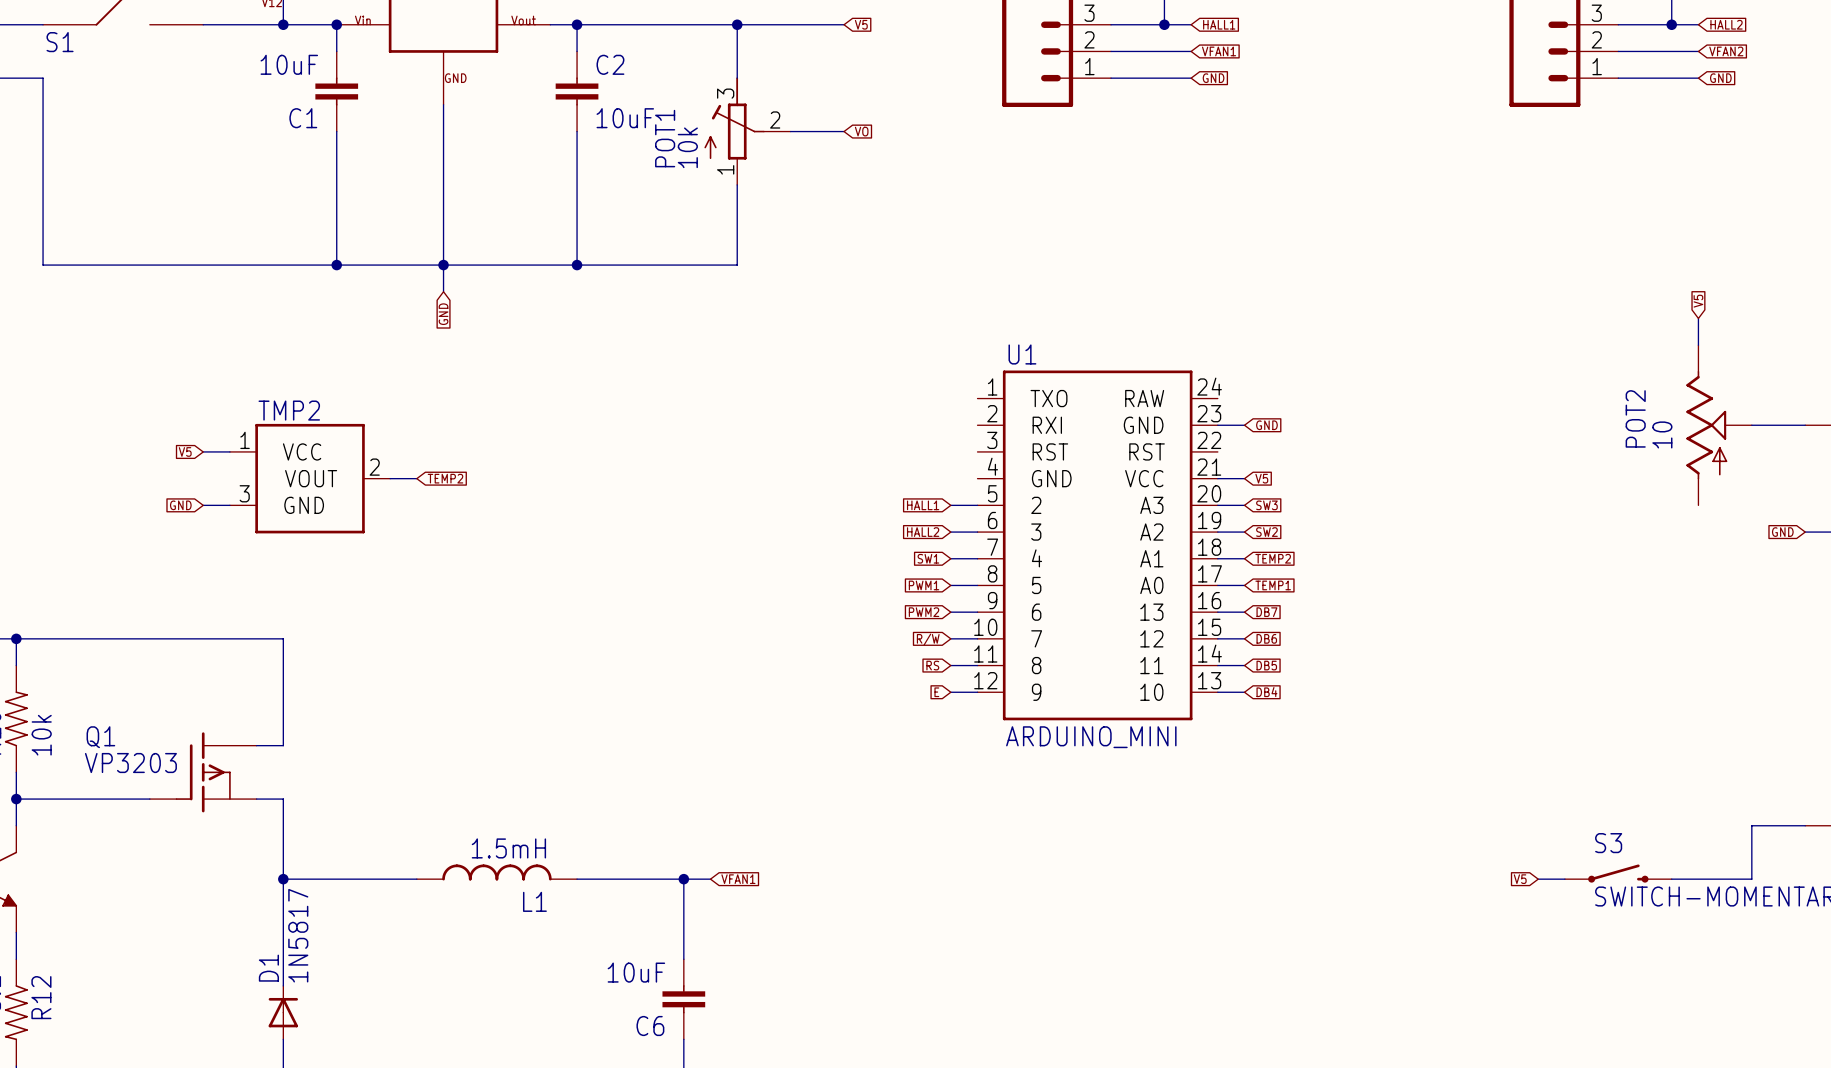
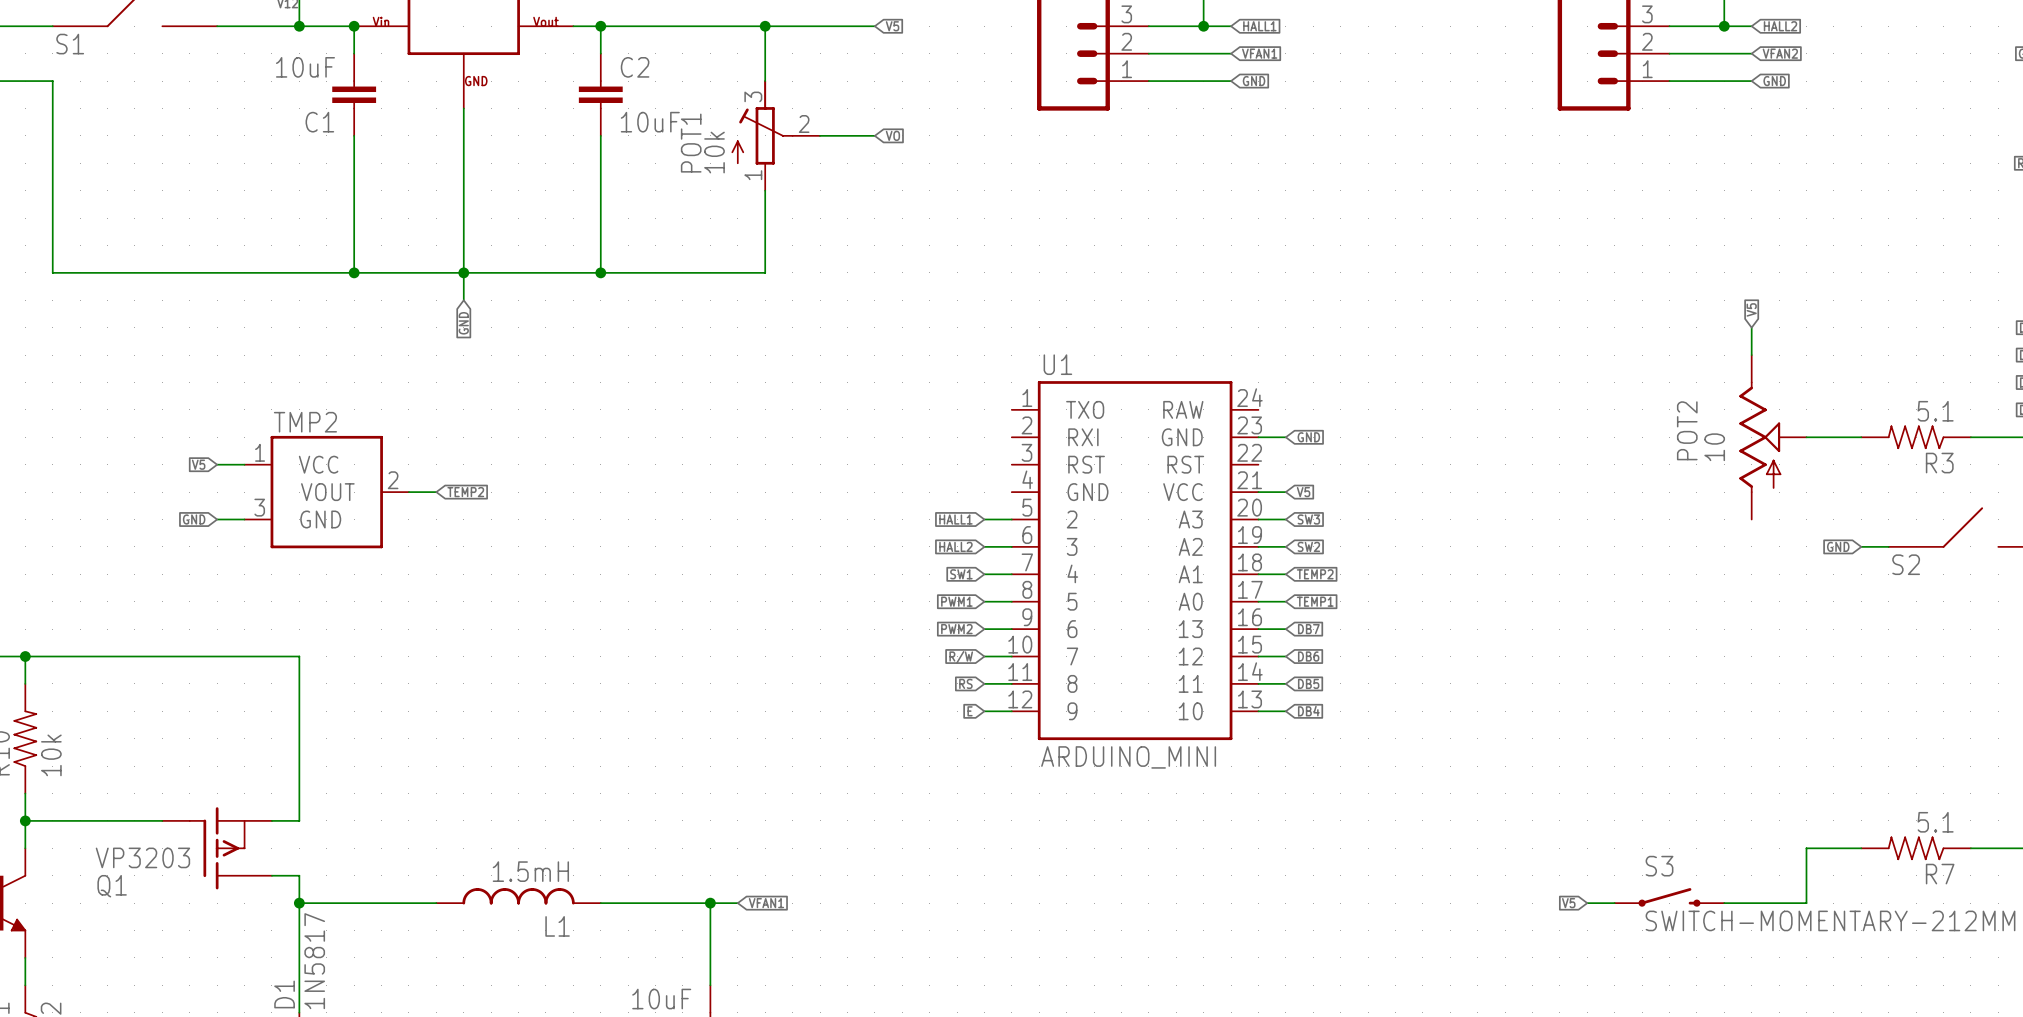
wire: (256, 745) (283, 745) -> (299, 820) (299, 766)
Q1 flip: as is (203, 772) -> up-down (217, 848)
wire: (283, 799) (283, 852) -> (271, 875) (299, 875)

